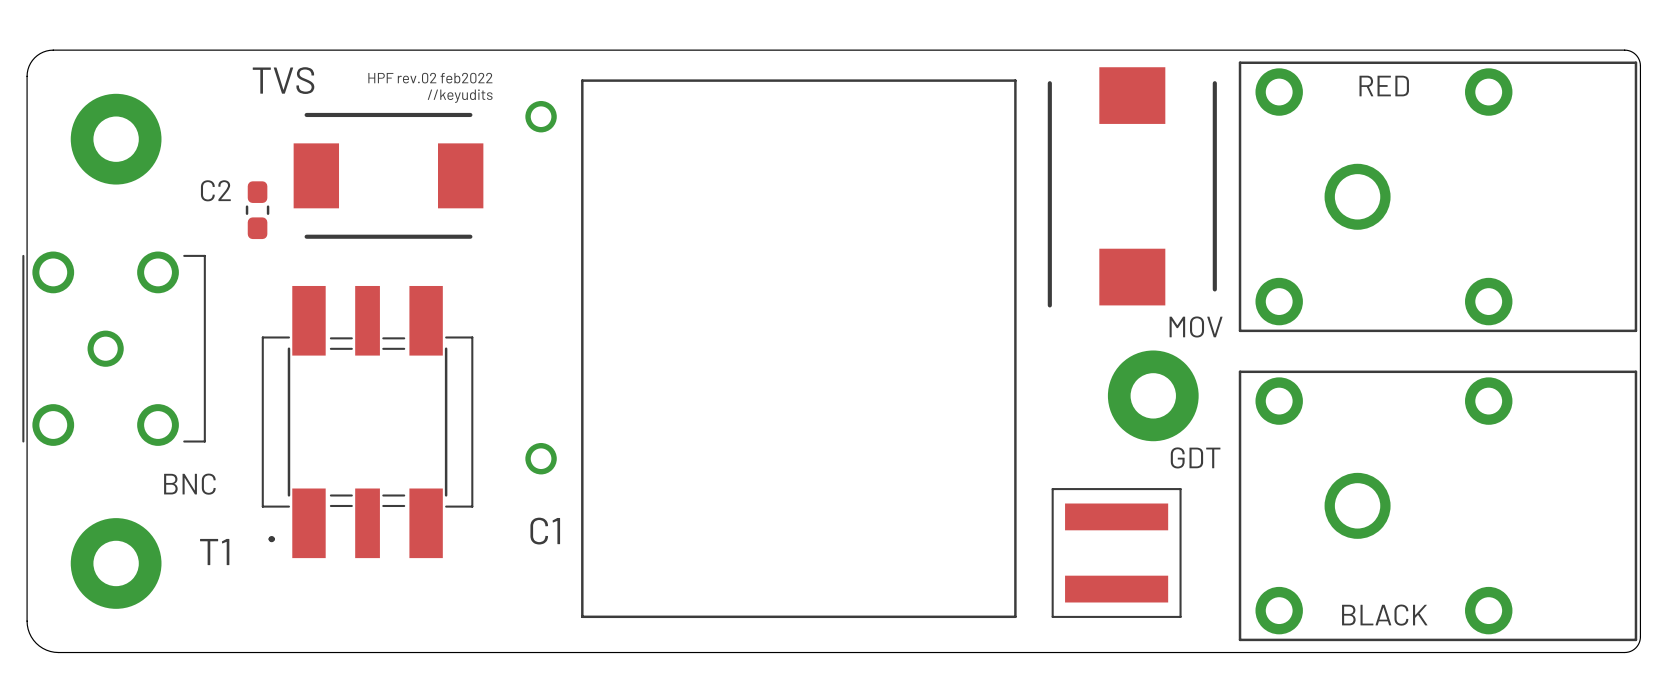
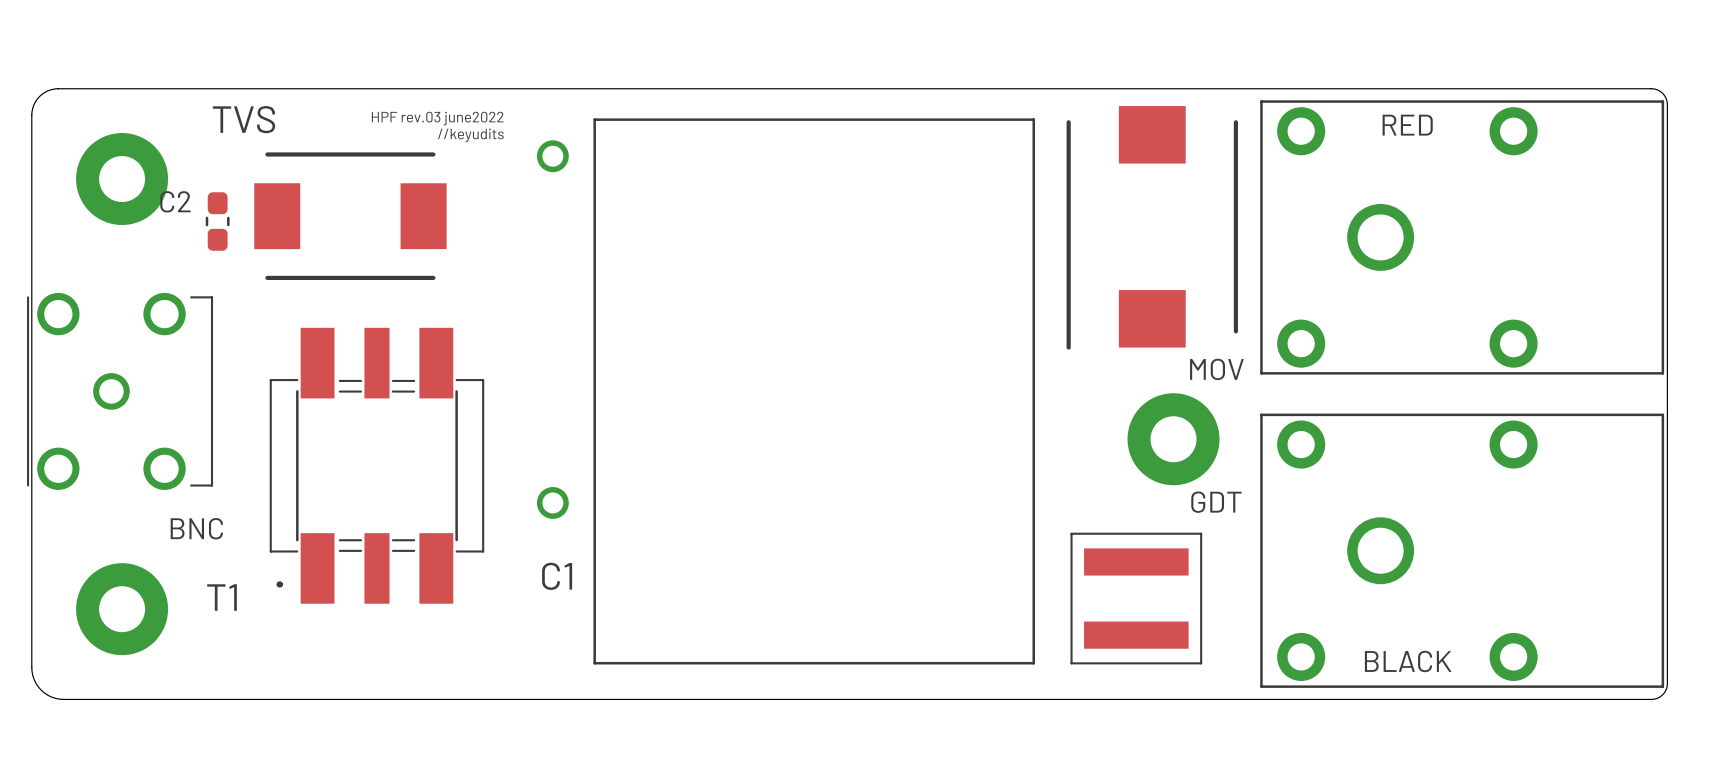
text: HPF rev.02 feb2022 (430, 78) -> HPF rev.03 june2022 (437, 118)
TVS position: (388, 175) -> (350, 216)
C2 position: (257, 210) -> (217, 221)

